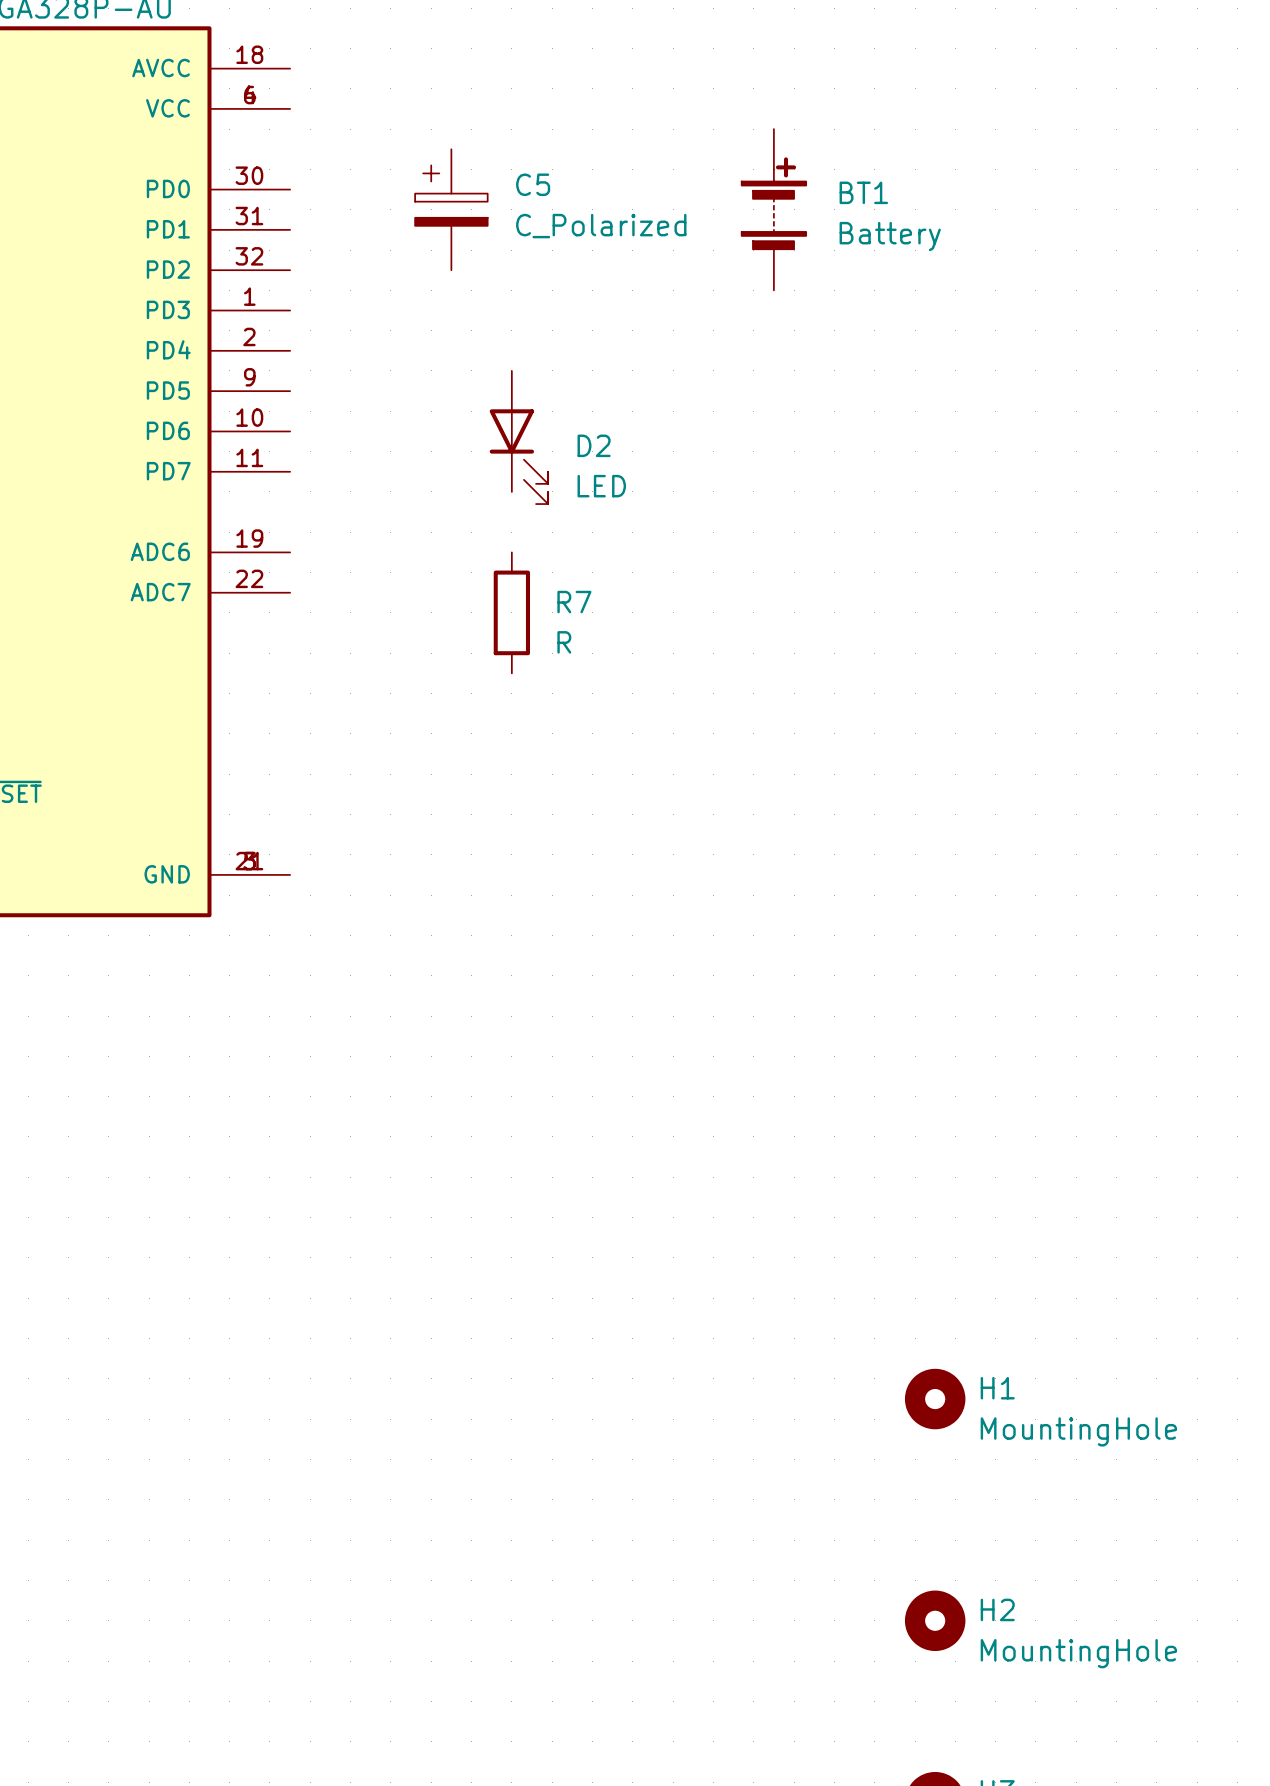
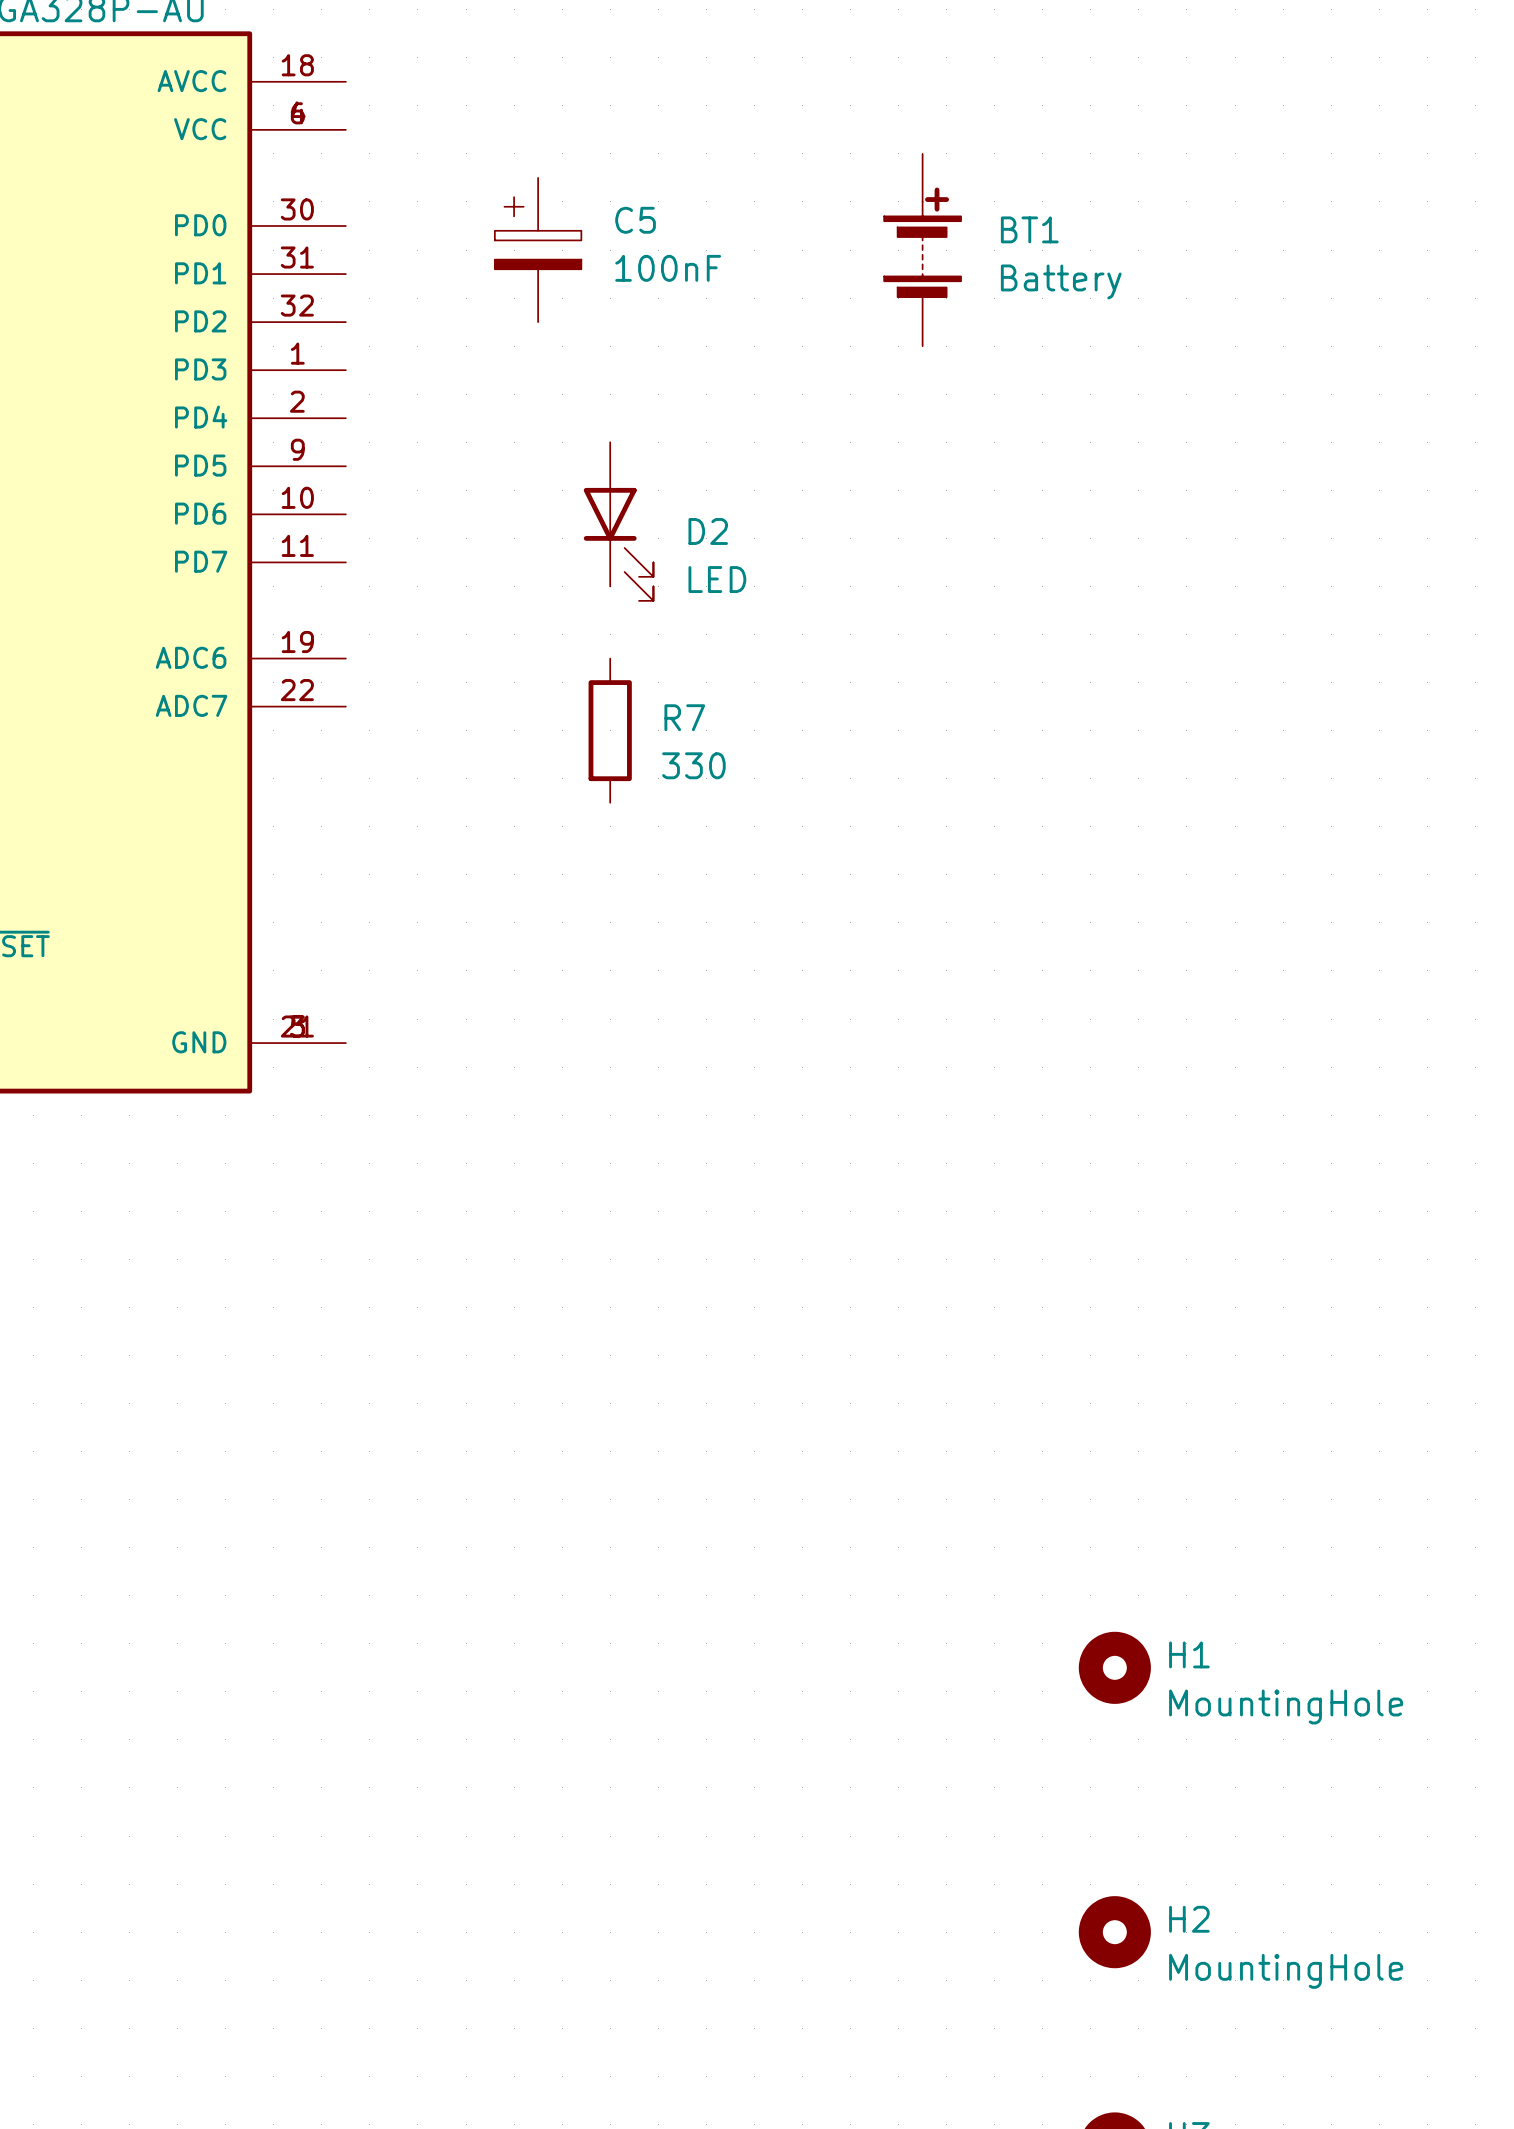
C5 value: C_Polarized (601, 226) -> 100nF (668, 268)
R7 value: R (564, 642) -> 330 (693, 765)

